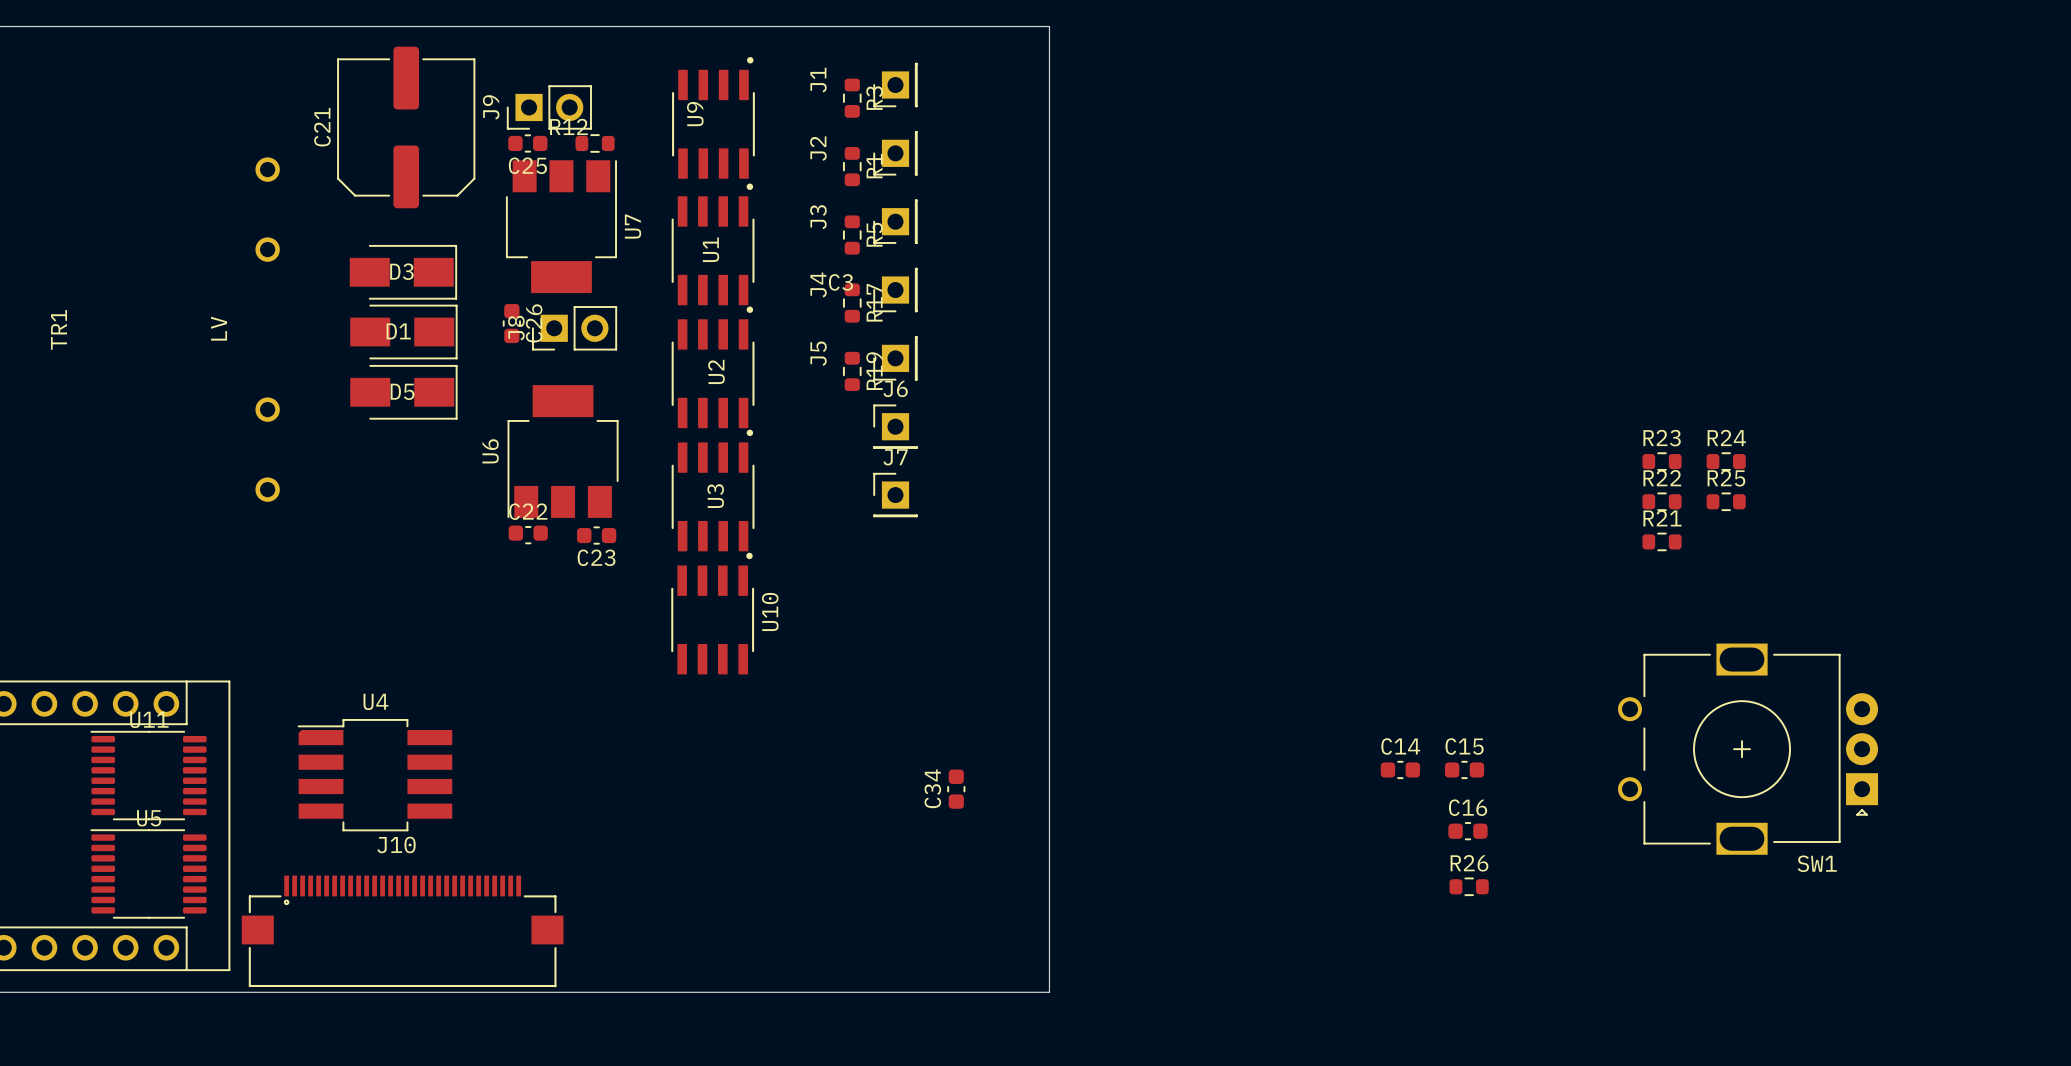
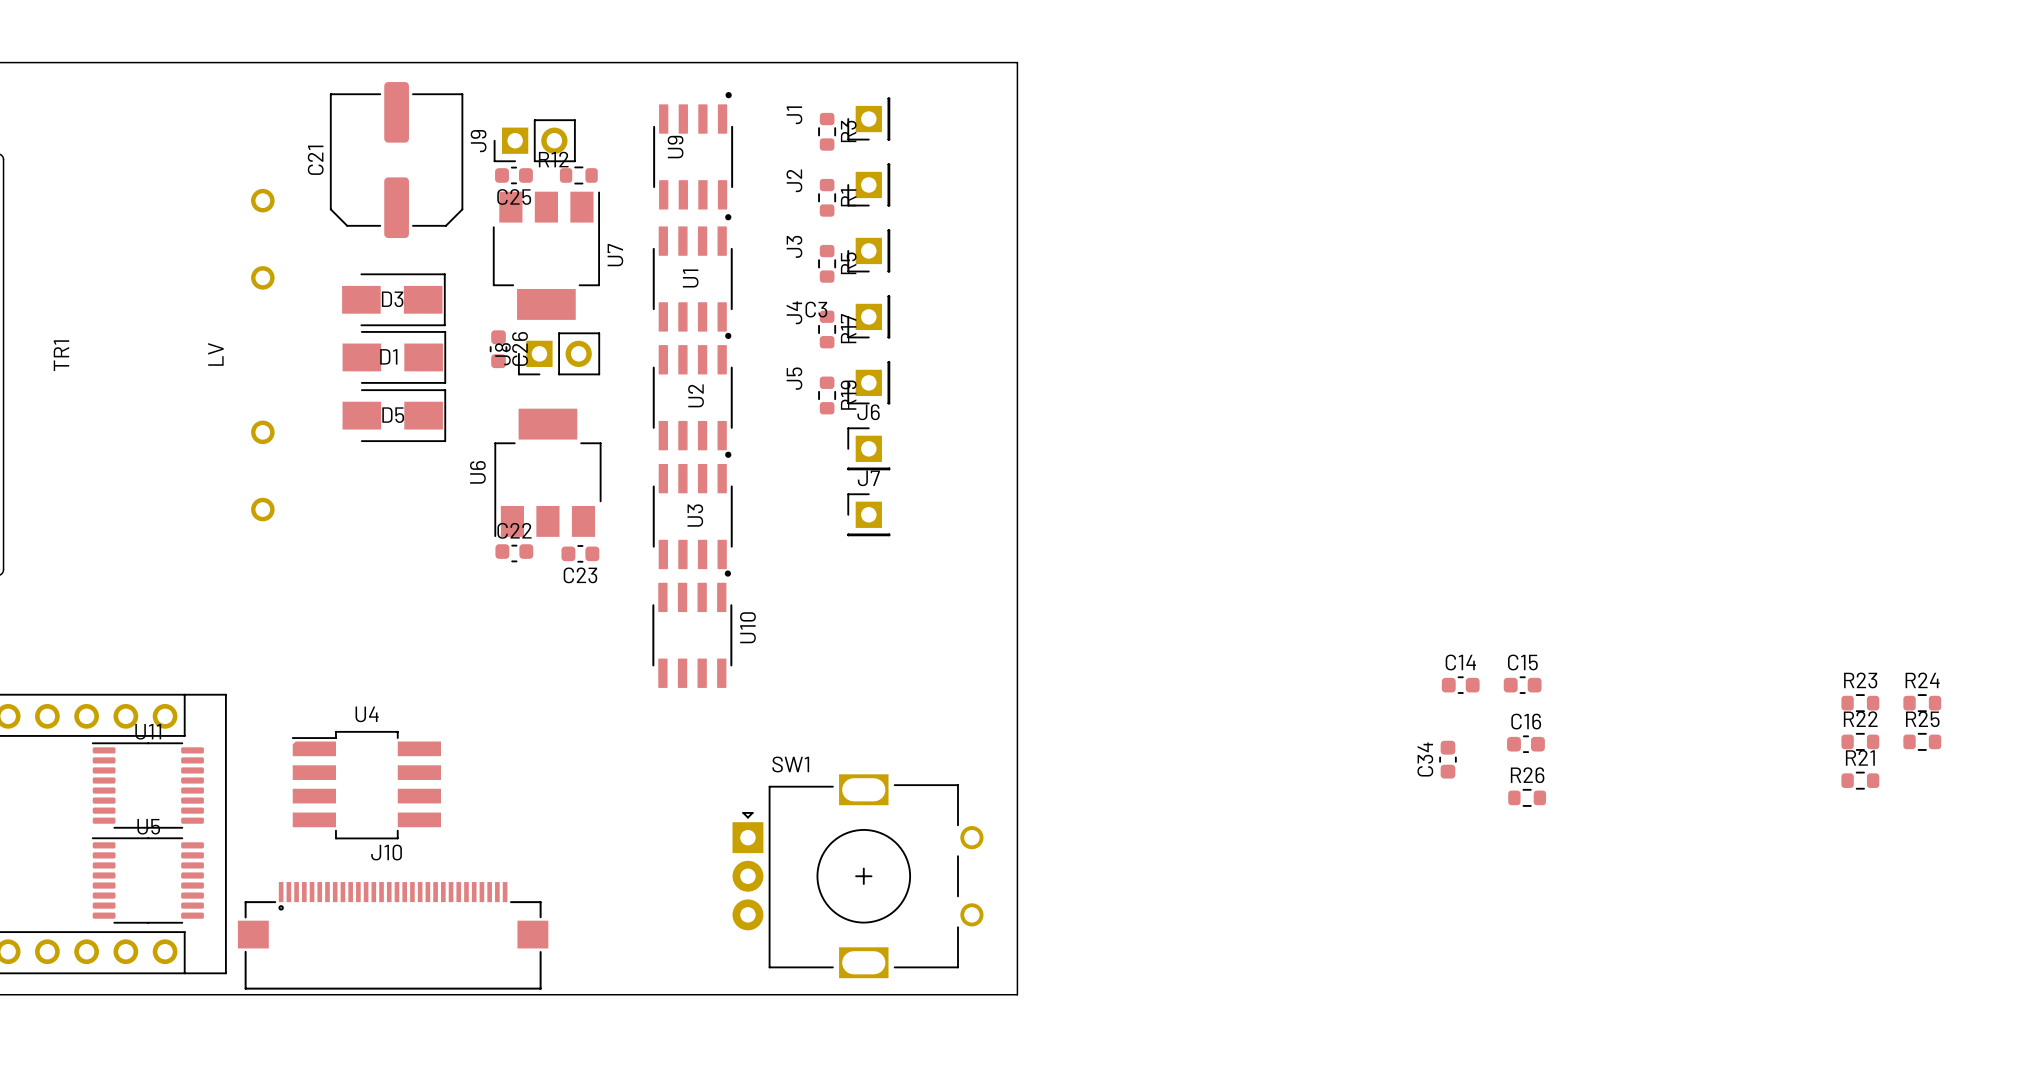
R23 position: (1662, 461) -> (1860, 703)
R24 position: (1726, 461) -> (1922, 703)
R22 position: (1662, 501) -> (1860, 741)
R25 position: (1726, 501) -> (1922, 741)
R21 position: (1662, 541) -> (1860, 780)
SW1 rotation: 0° (1748, 749) -> 180° (858, 876)
SW1 position: (1748, 749) -> (858, 876)
C14 position: (1400, 769) -> (1460, 685)
C15 position: (1464, 769) -> (1522, 685)
C34 position: (956, 789) -> (1447, 759)
C16 position: (1467, 831) -> (1525, 744)
R26 position: (1469, 886) -> (1527, 797)

